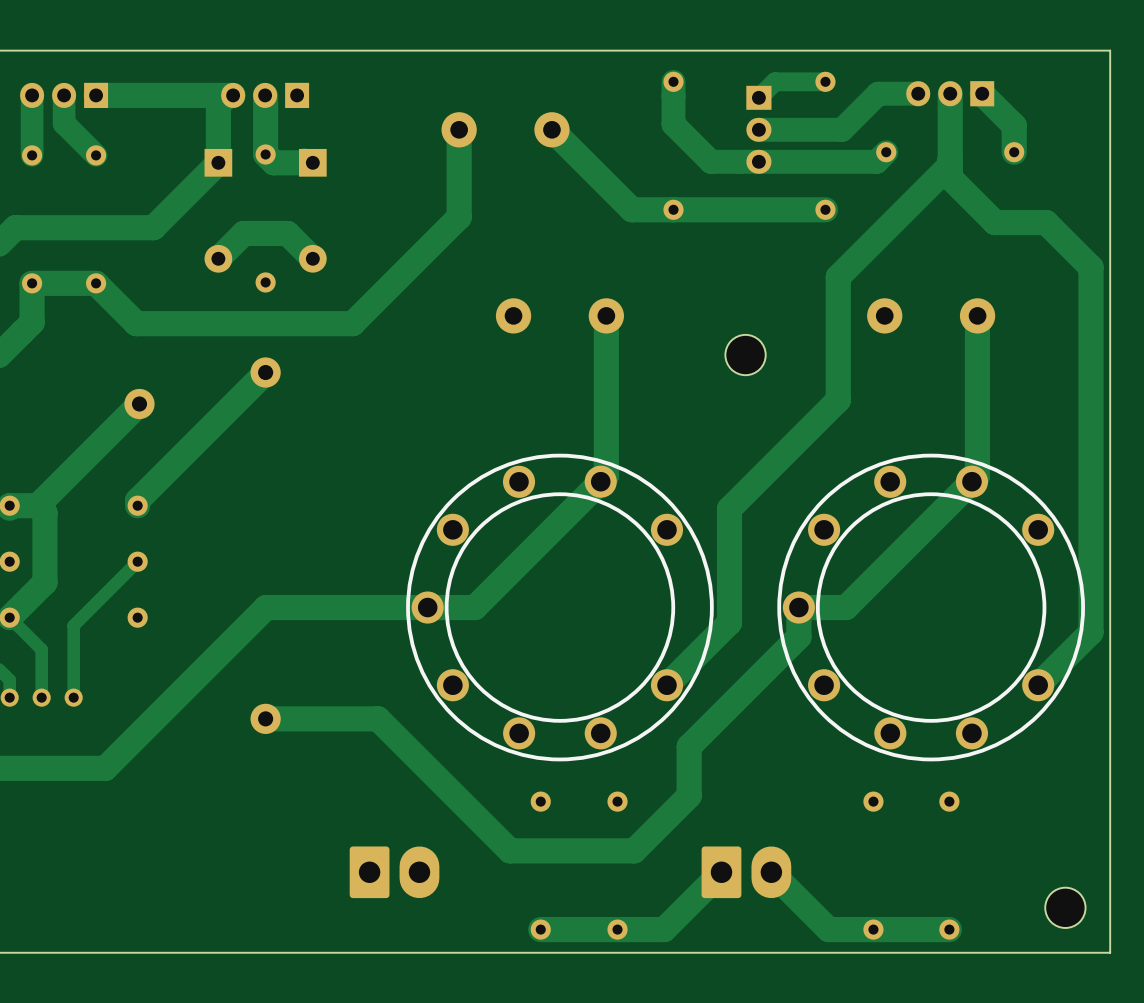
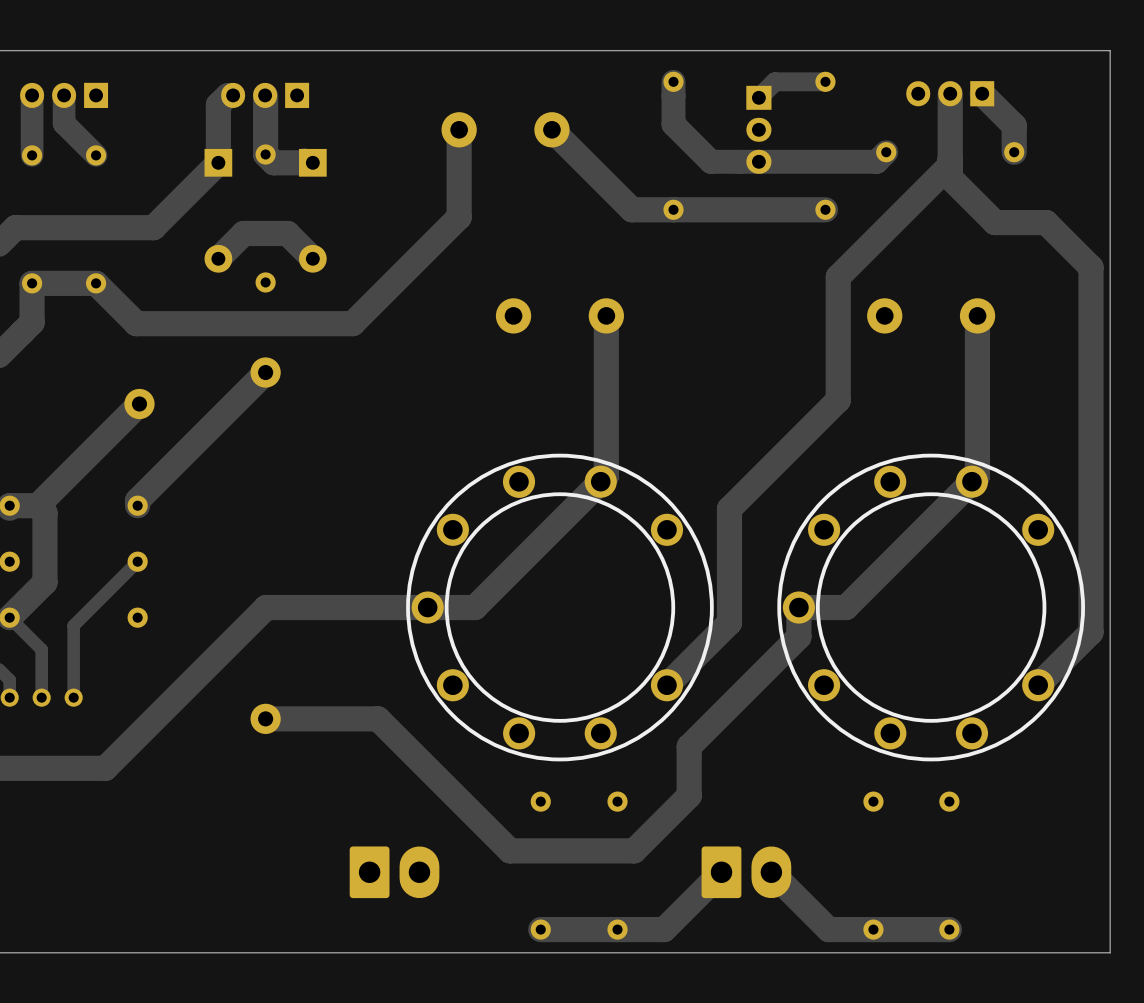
track: (918, 93) (878, 93) (842, 129) (758, 129) -> none
track: (233, 95) (96, 95) -> none
part: (745, 355) -> none
part: (1065, 907) -> none

